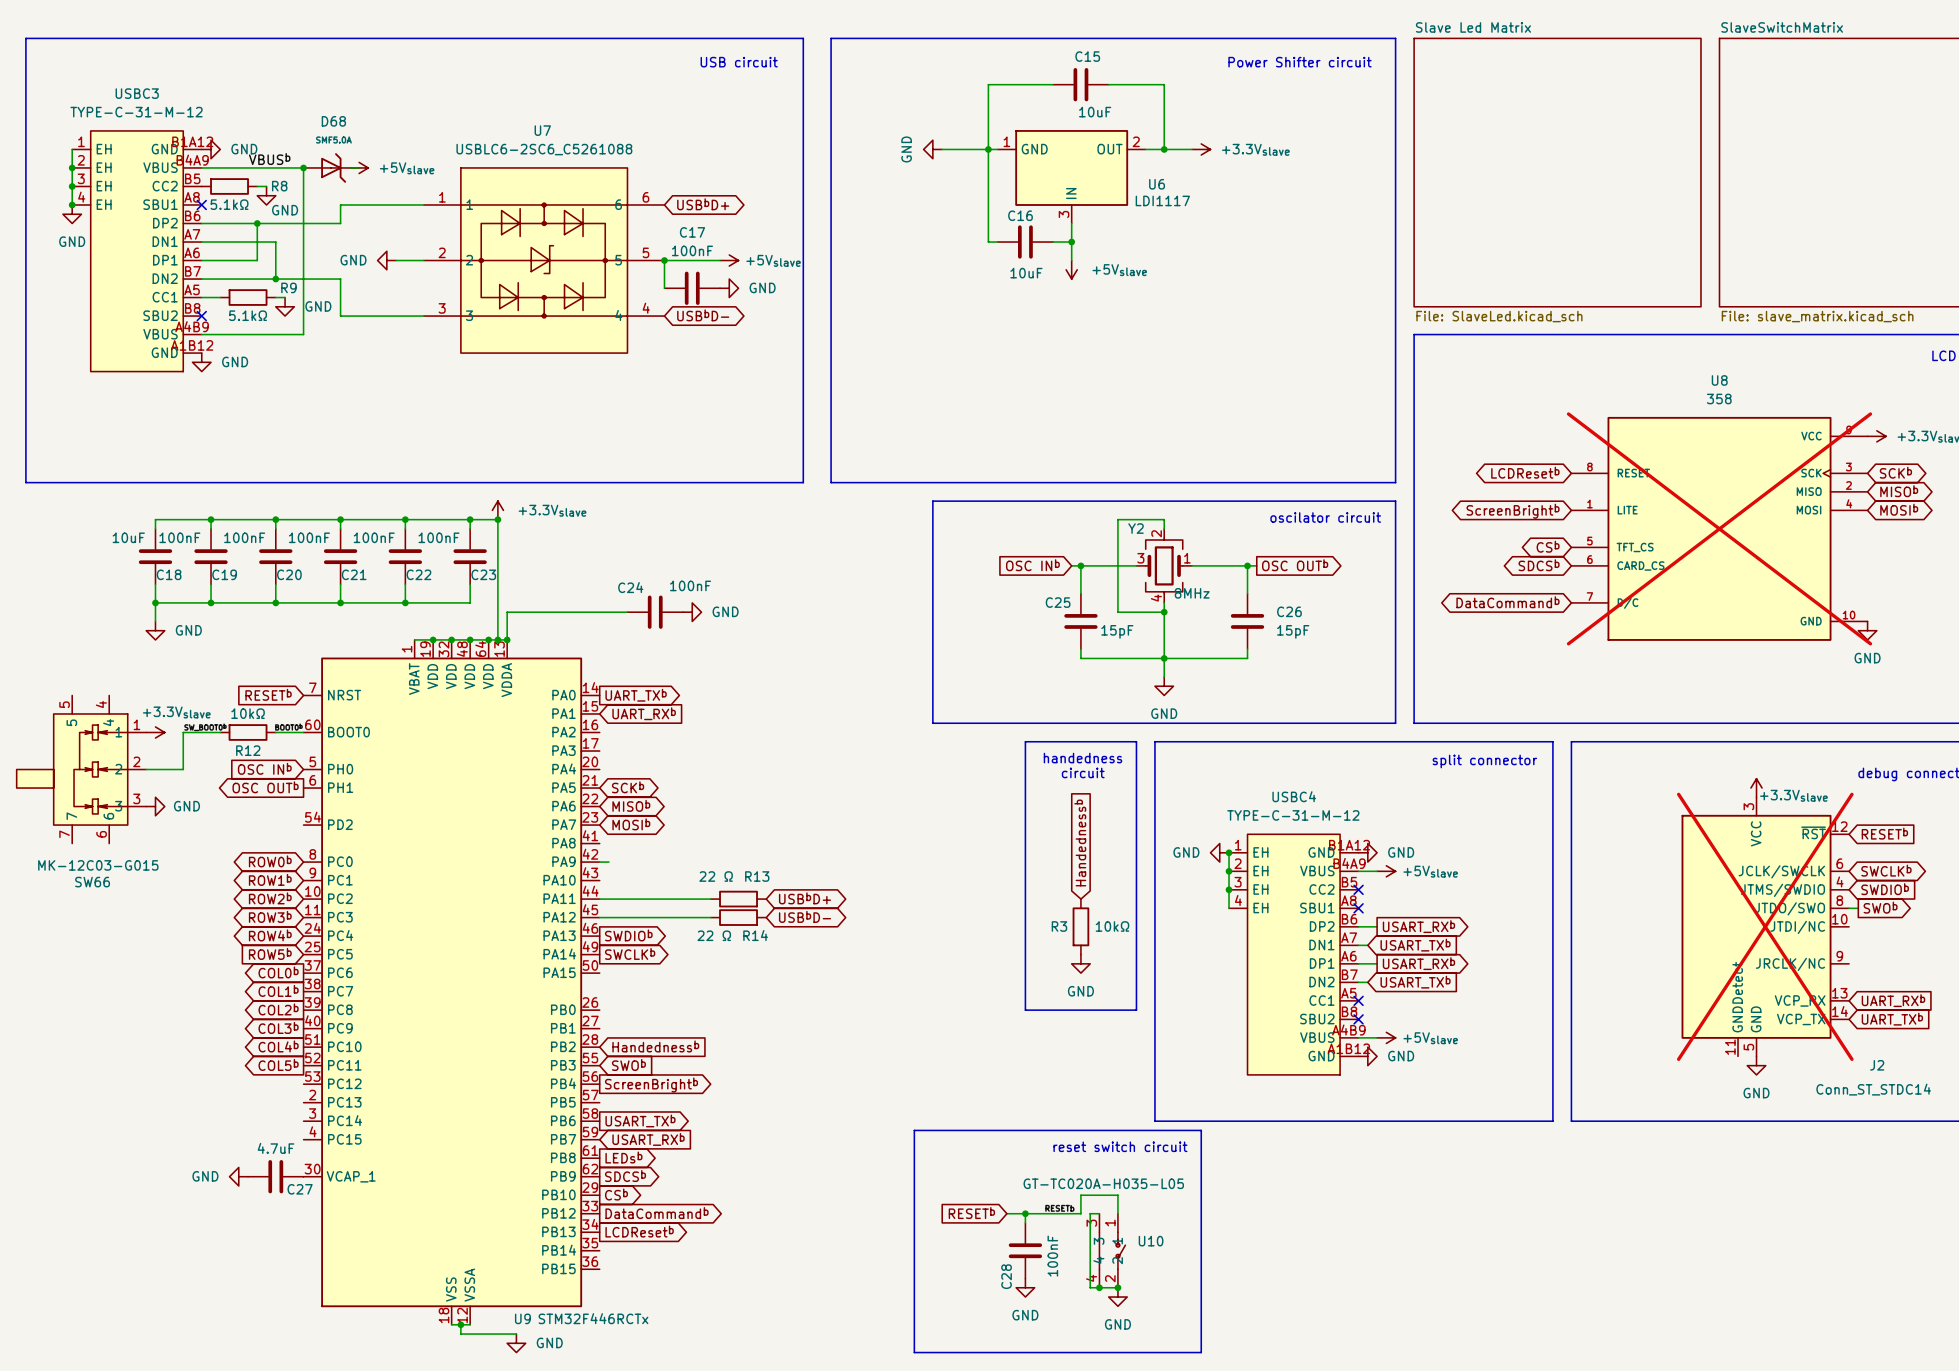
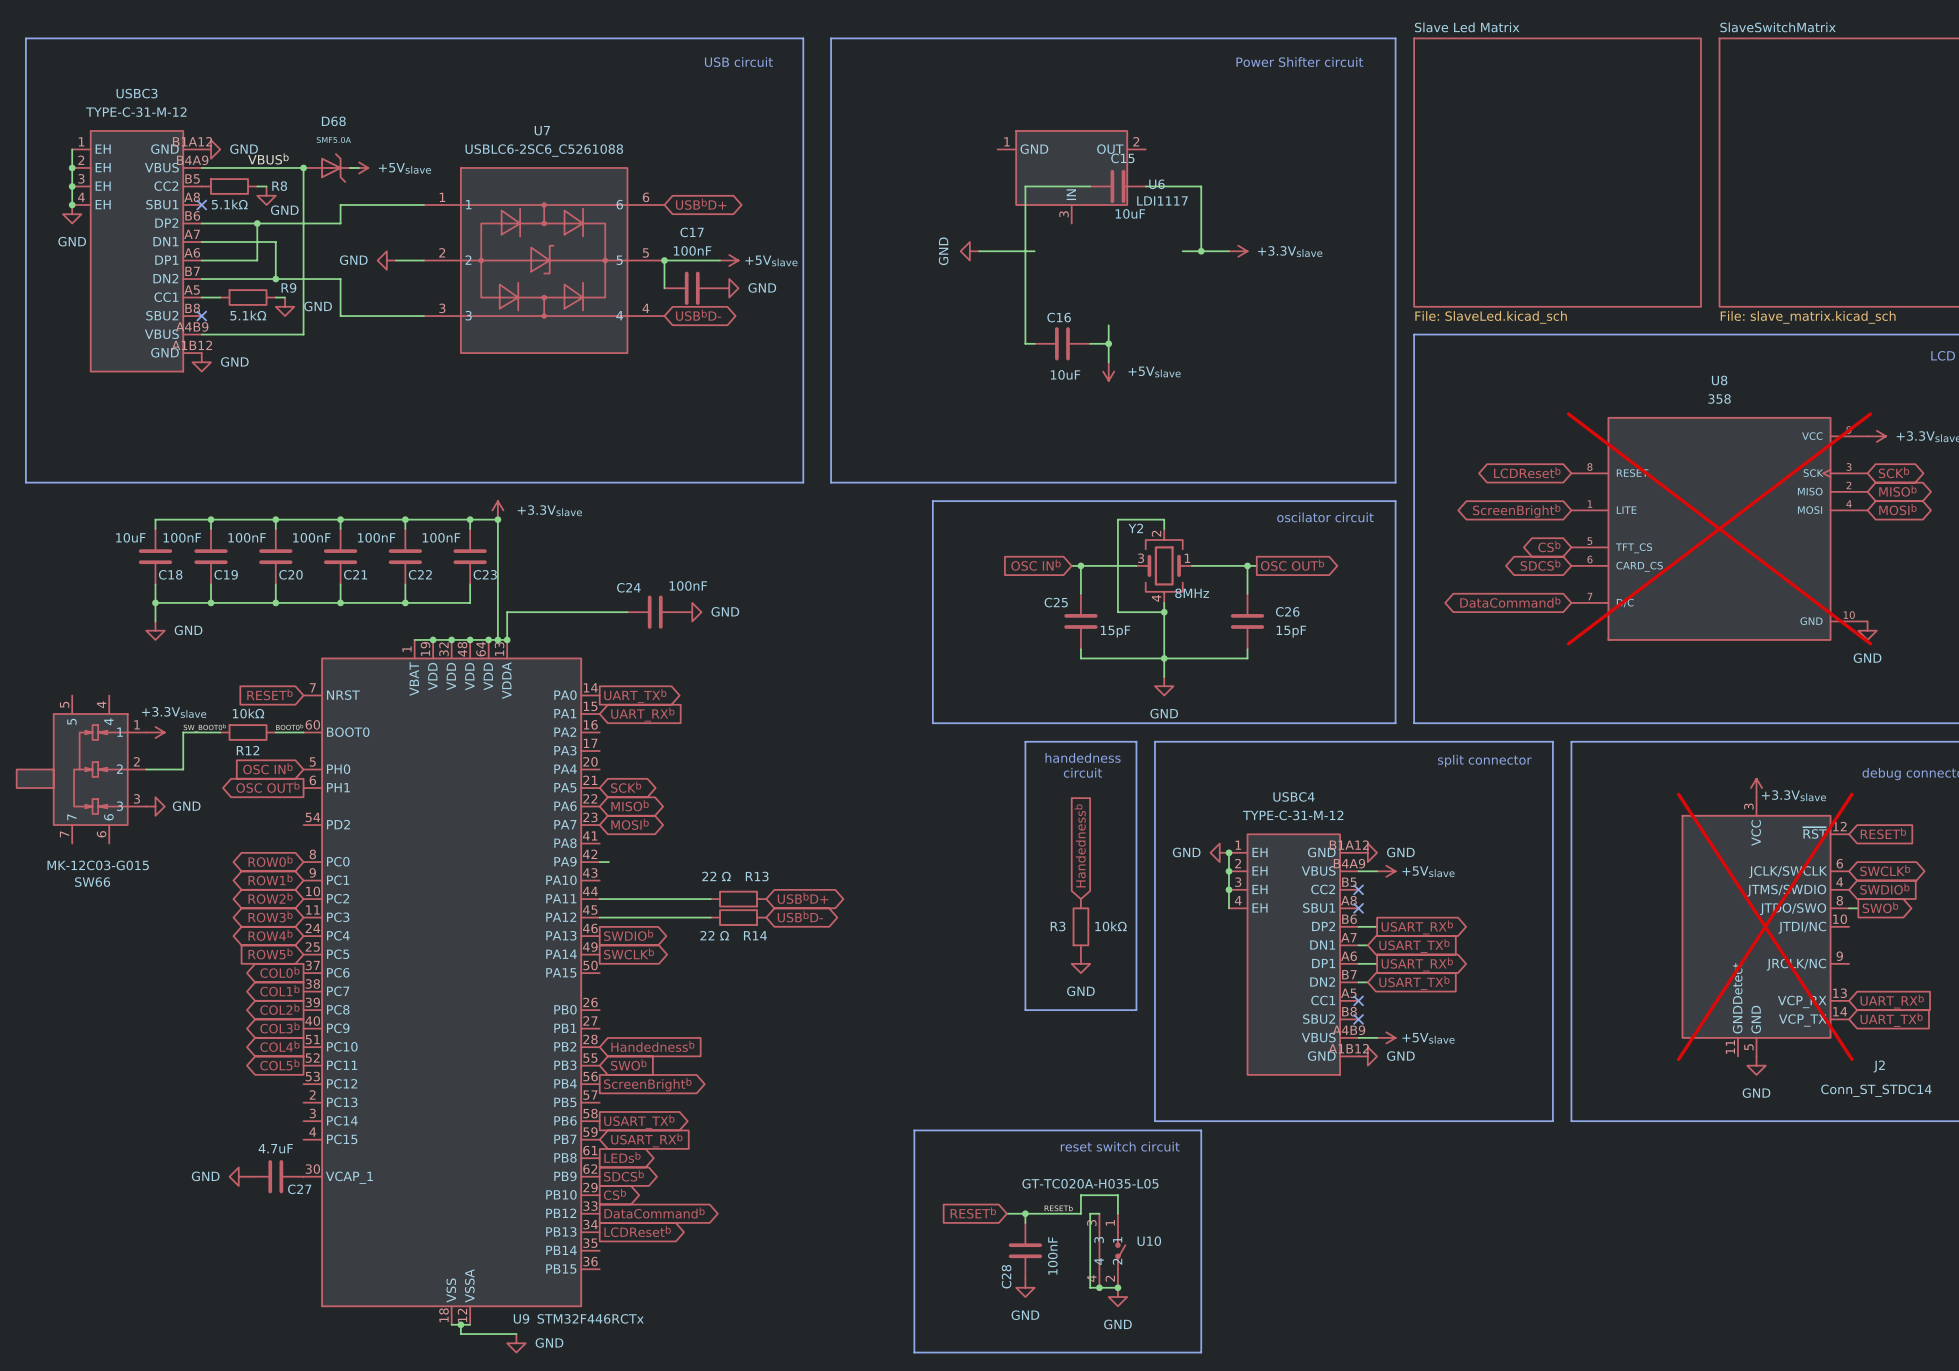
wire: (1053, 84) (988, 84) (988, 242) (997, 242) -> (1090, 186) (1025, 186) (1025, 343) (1034, 343)
C15 position: (1080, 84) -> (1117, 186)
wire: (1108, 84) (1164, 84) (1164, 149) -> (1145, 186) (1201, 186) (1201, 251)
power symbol position: GND (932, 149) -> GND (969, 251)
wire: (942, 149) (997, 149) -> (979, 251) (1034, 251)
junction: (988, 149) -> none
wire: (1145, 149) (1191, 149) -> (1182, 251) (1229, 251)
junction: (1164, 149) -> none
power symbol position: +3.3Vslave (1201, 149) -> +3.3Vslave (1238, 251)
wire: (1071, 223) (1071, 260) -> (1108, 325) (1108, 362)
C16 position: (1025, 242) -> (1062, 343)
wire: (1053, 242) (1071, 242) -> (1090, 343) (1108, 343)
junction: (1071, 242) -> none
junction: none -> (1201, 251)
power symbol position: +5Vslave (1071, 269) -> +5Vslave (1108, 371)
junction: none -> (1108, 343)

